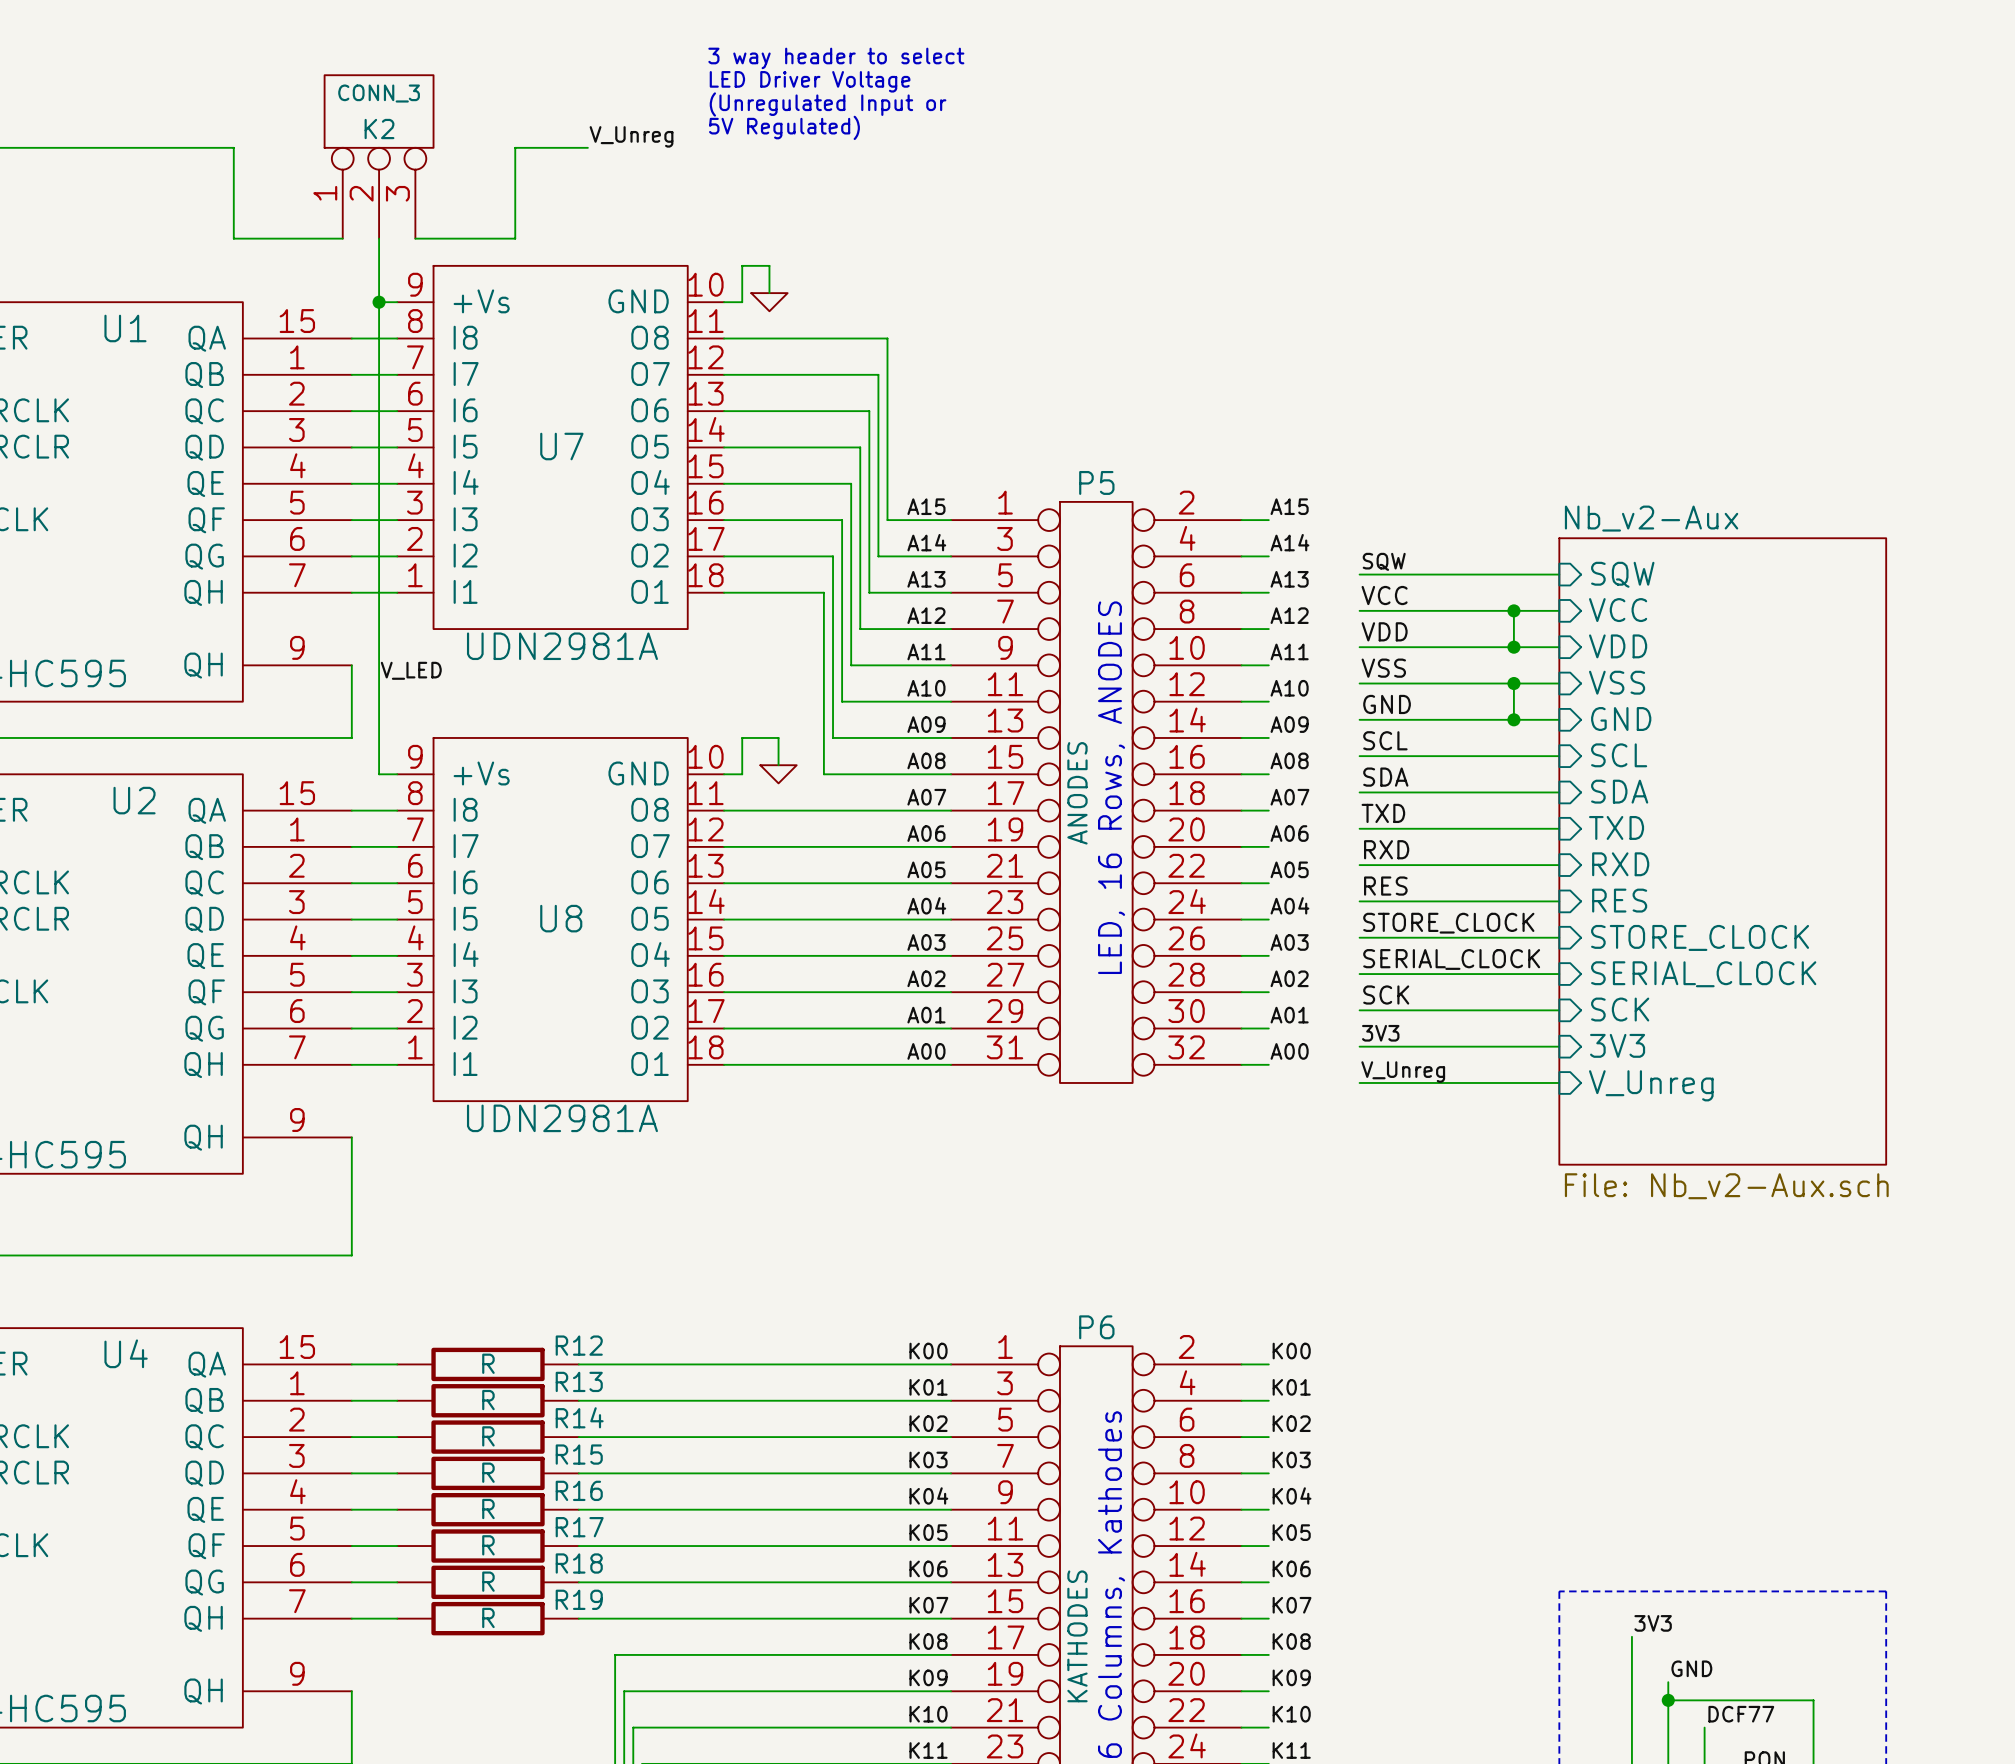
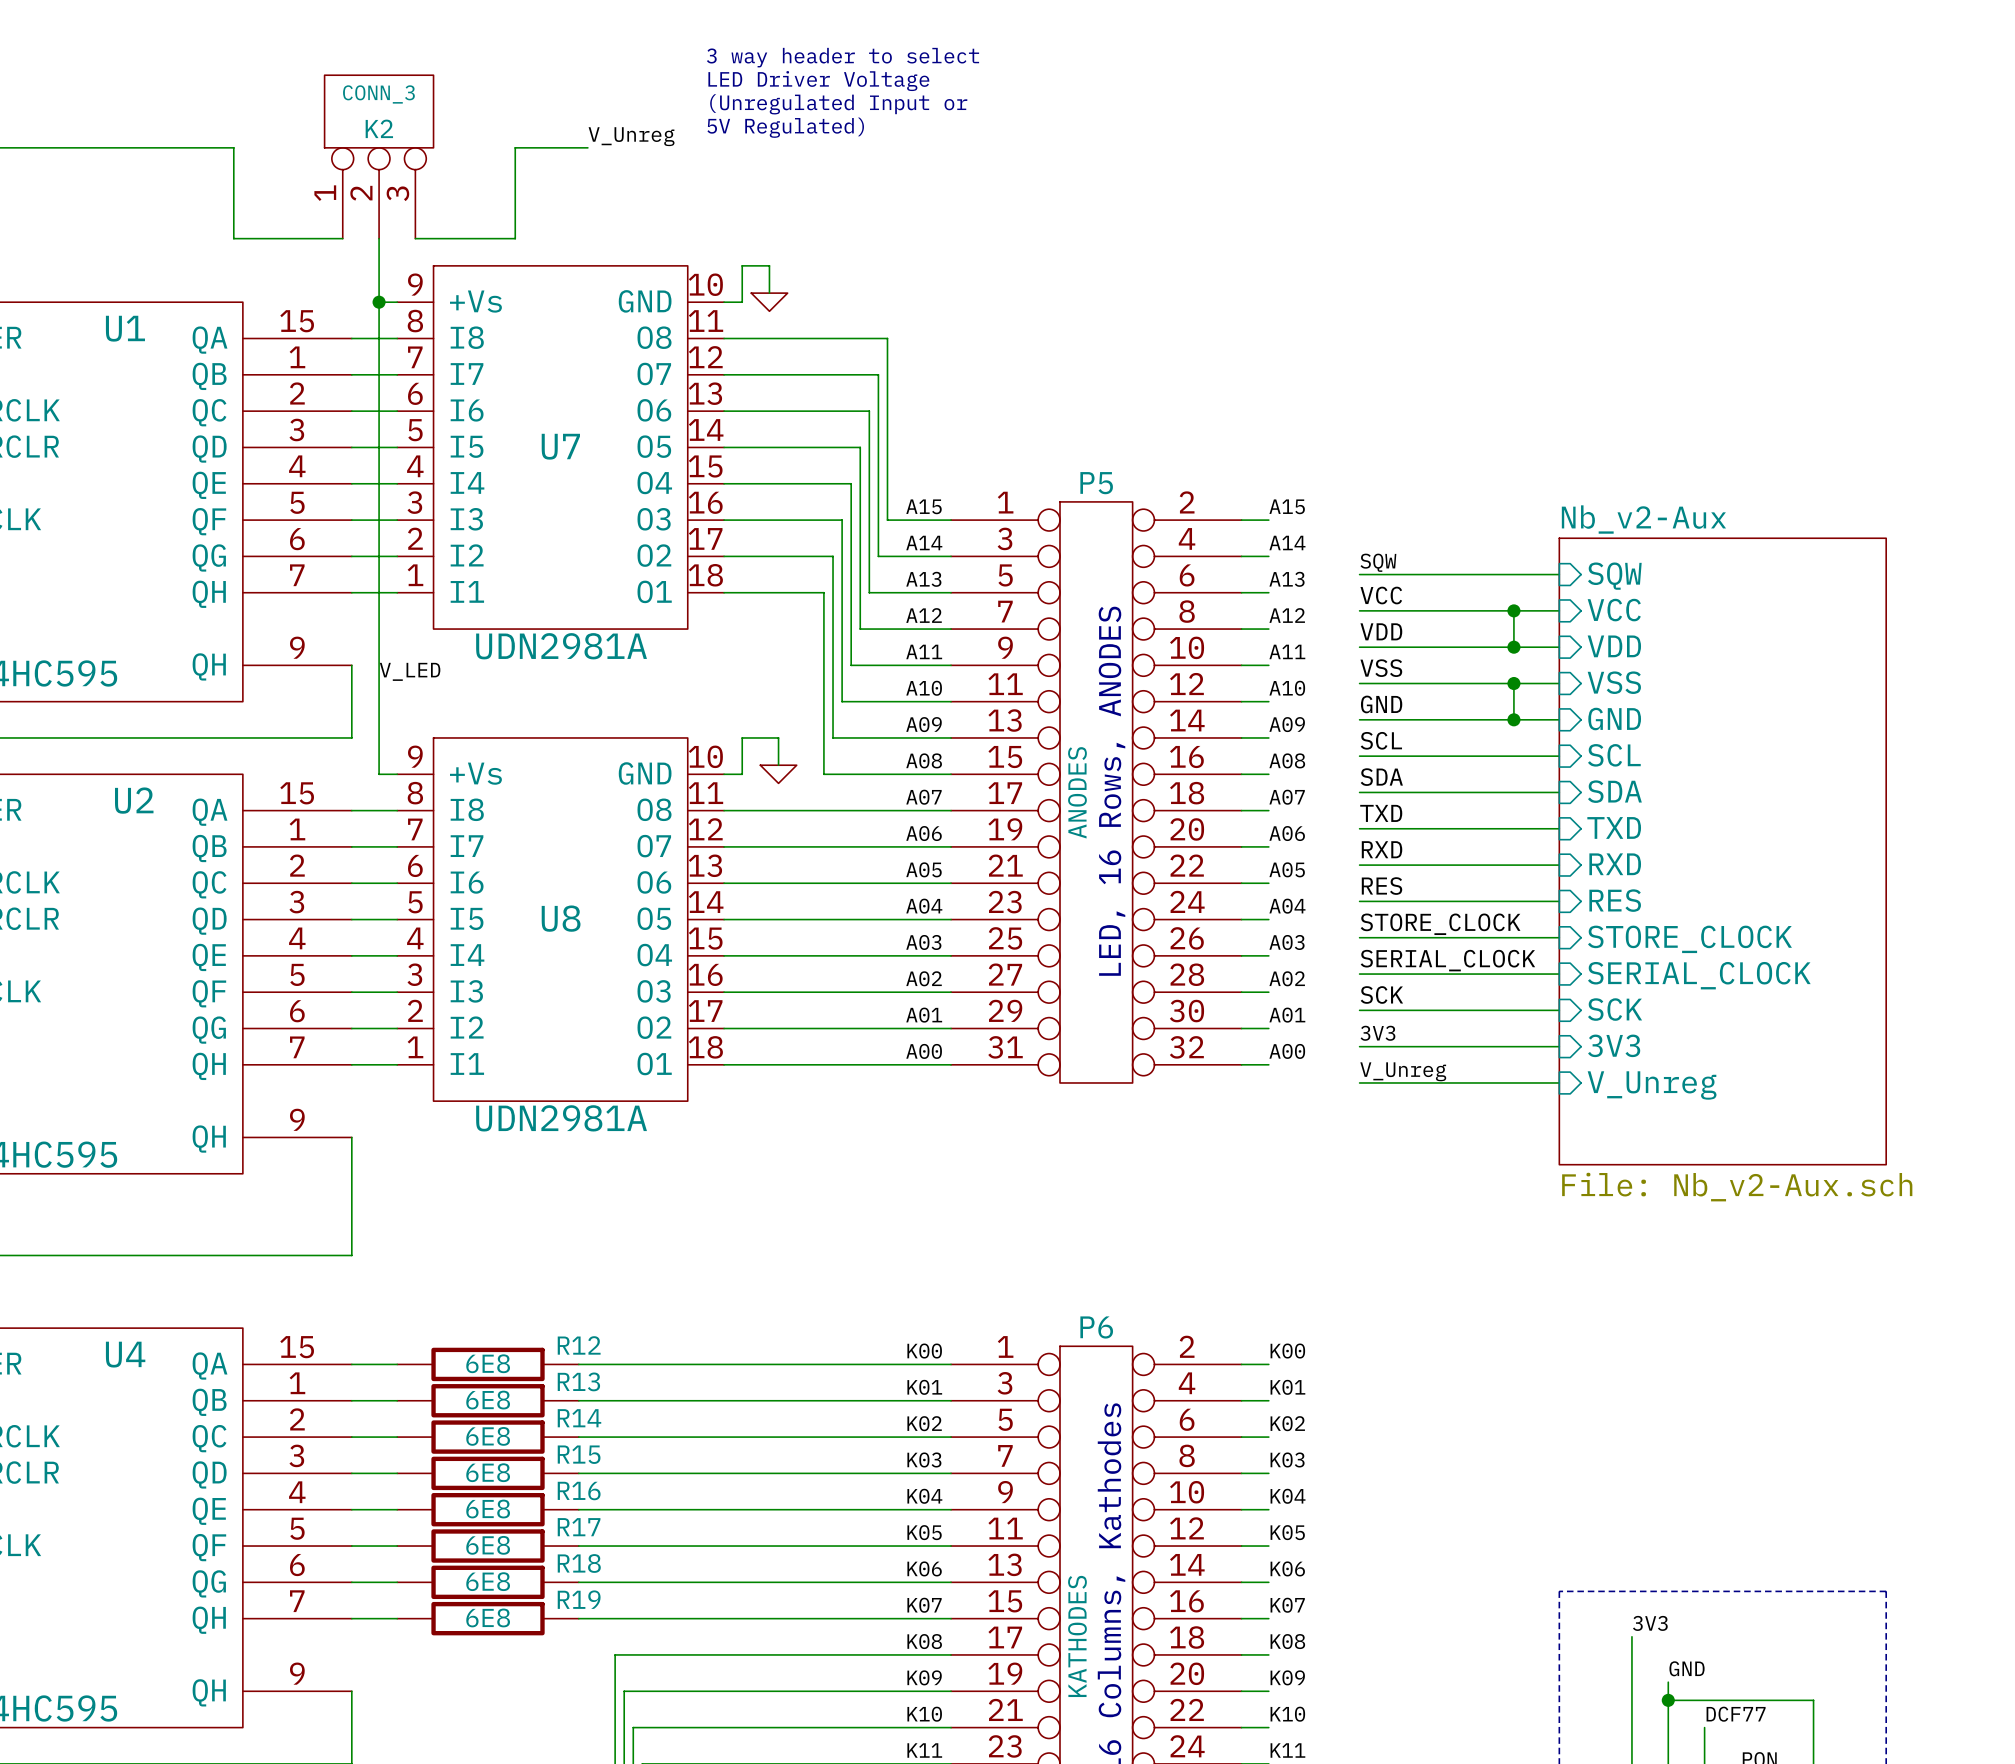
R12 value: R (488, 1363) -> 6E8 (488, 1363)
R13 value: R (488, 1400) -> 6E8 (488, 1400)
R14 value: R (488, 1436) -> 6E8 (488, 1436)
R15 value: R (488, 1472) -> 6E8 (488, 1472)
R16 value: R (488, 1509) -> 6E8 (488, 1509)
R17 value: R (488, 1545) -> 6E8 (488, 1545)
R18 value: R (488, 1581) -> 6E8 (488, 1581)
R19 value: R (488, 1617) -> 6E8 (488, 1617)

